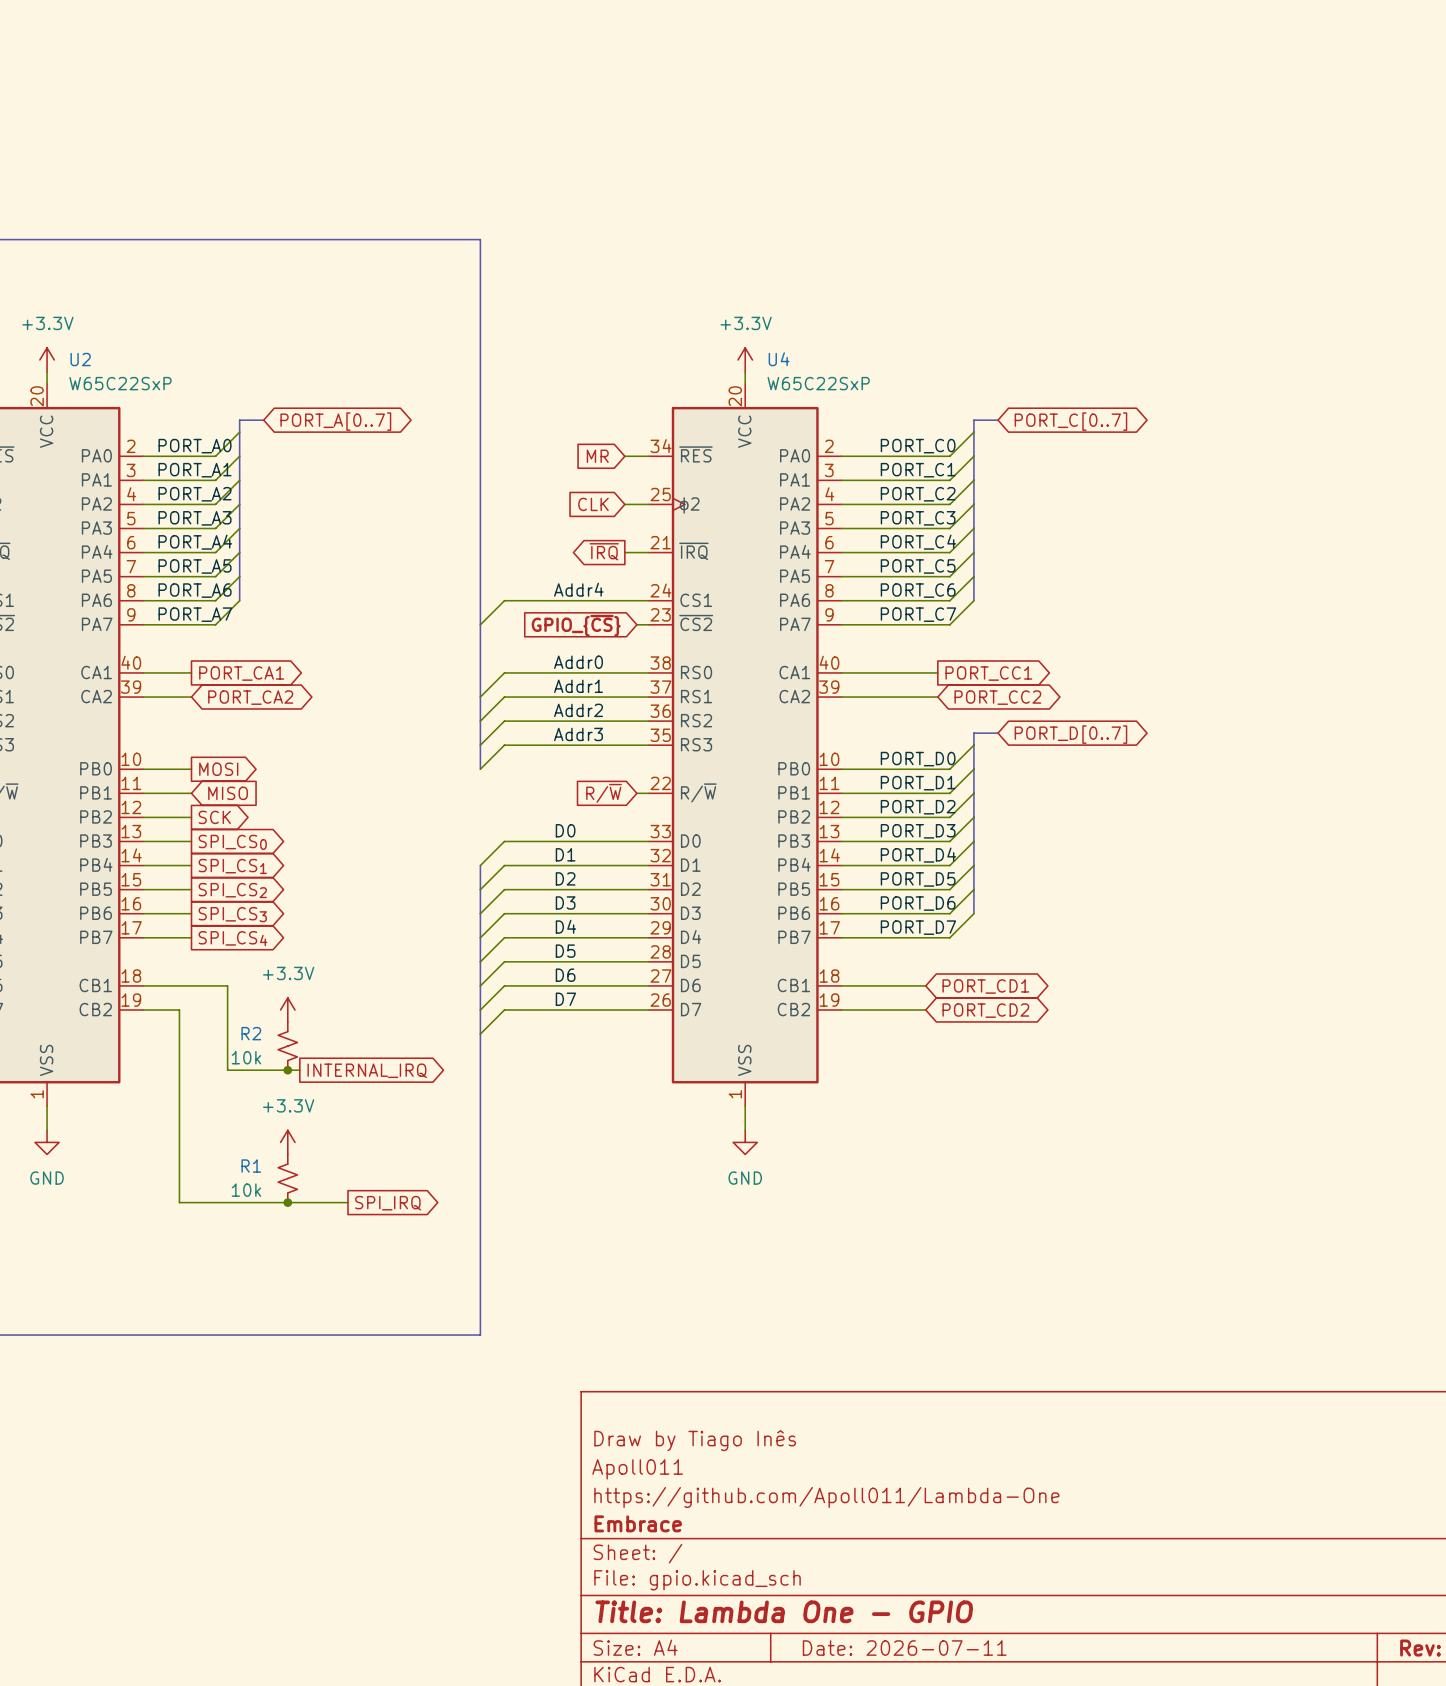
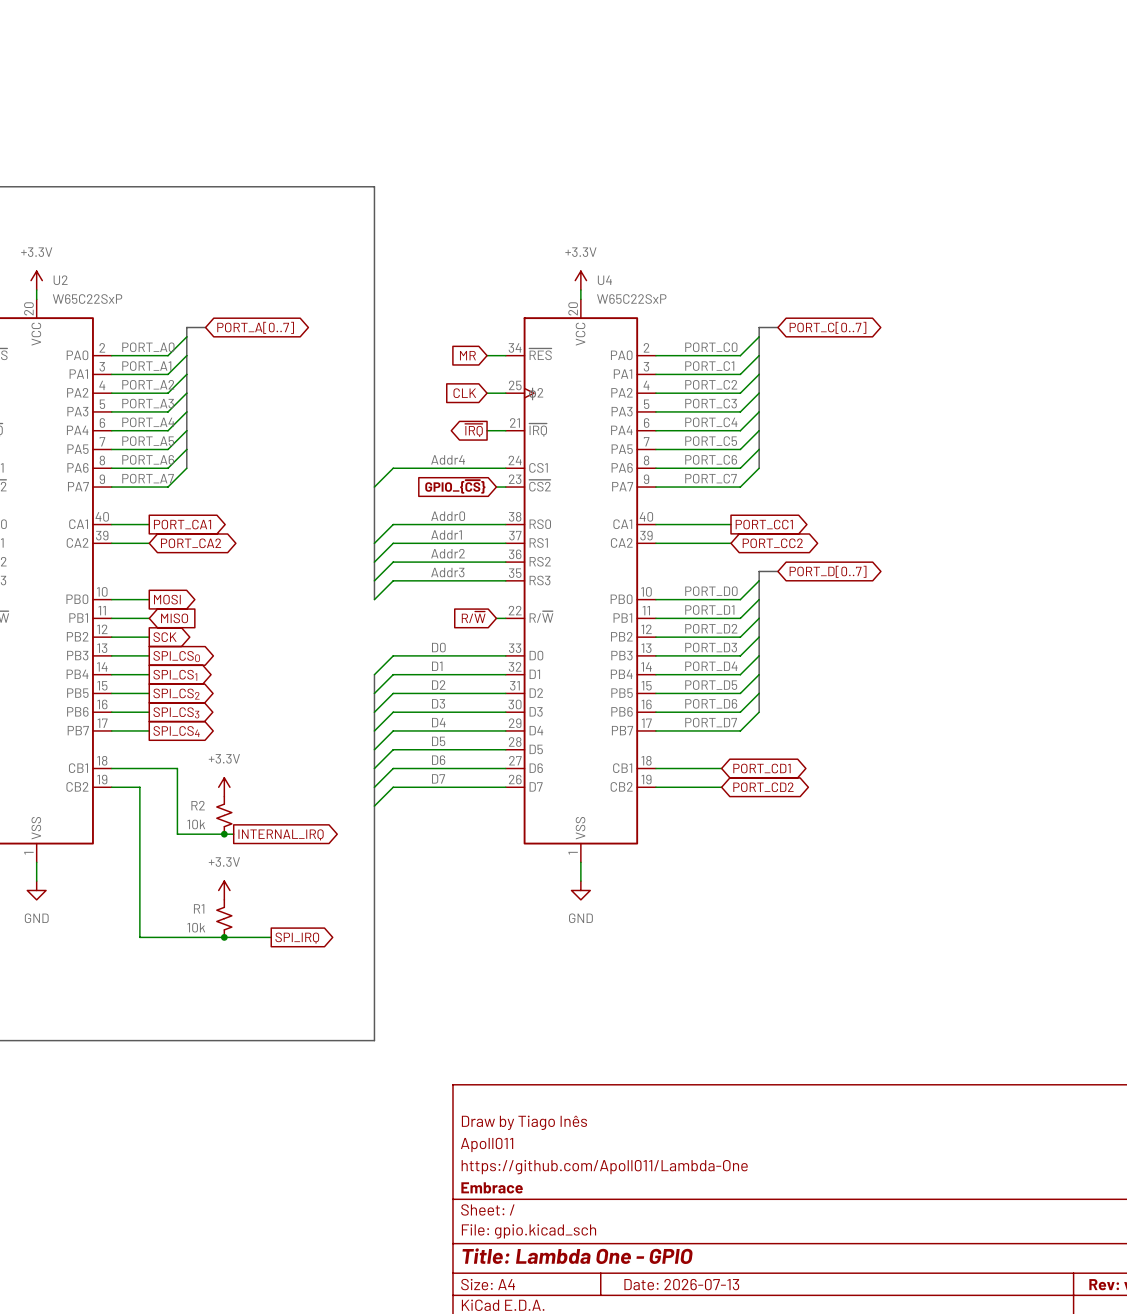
title block: Date: 2026-07-11 (904, 1648) -> Date: 2026-07-13 (681, 1284)

